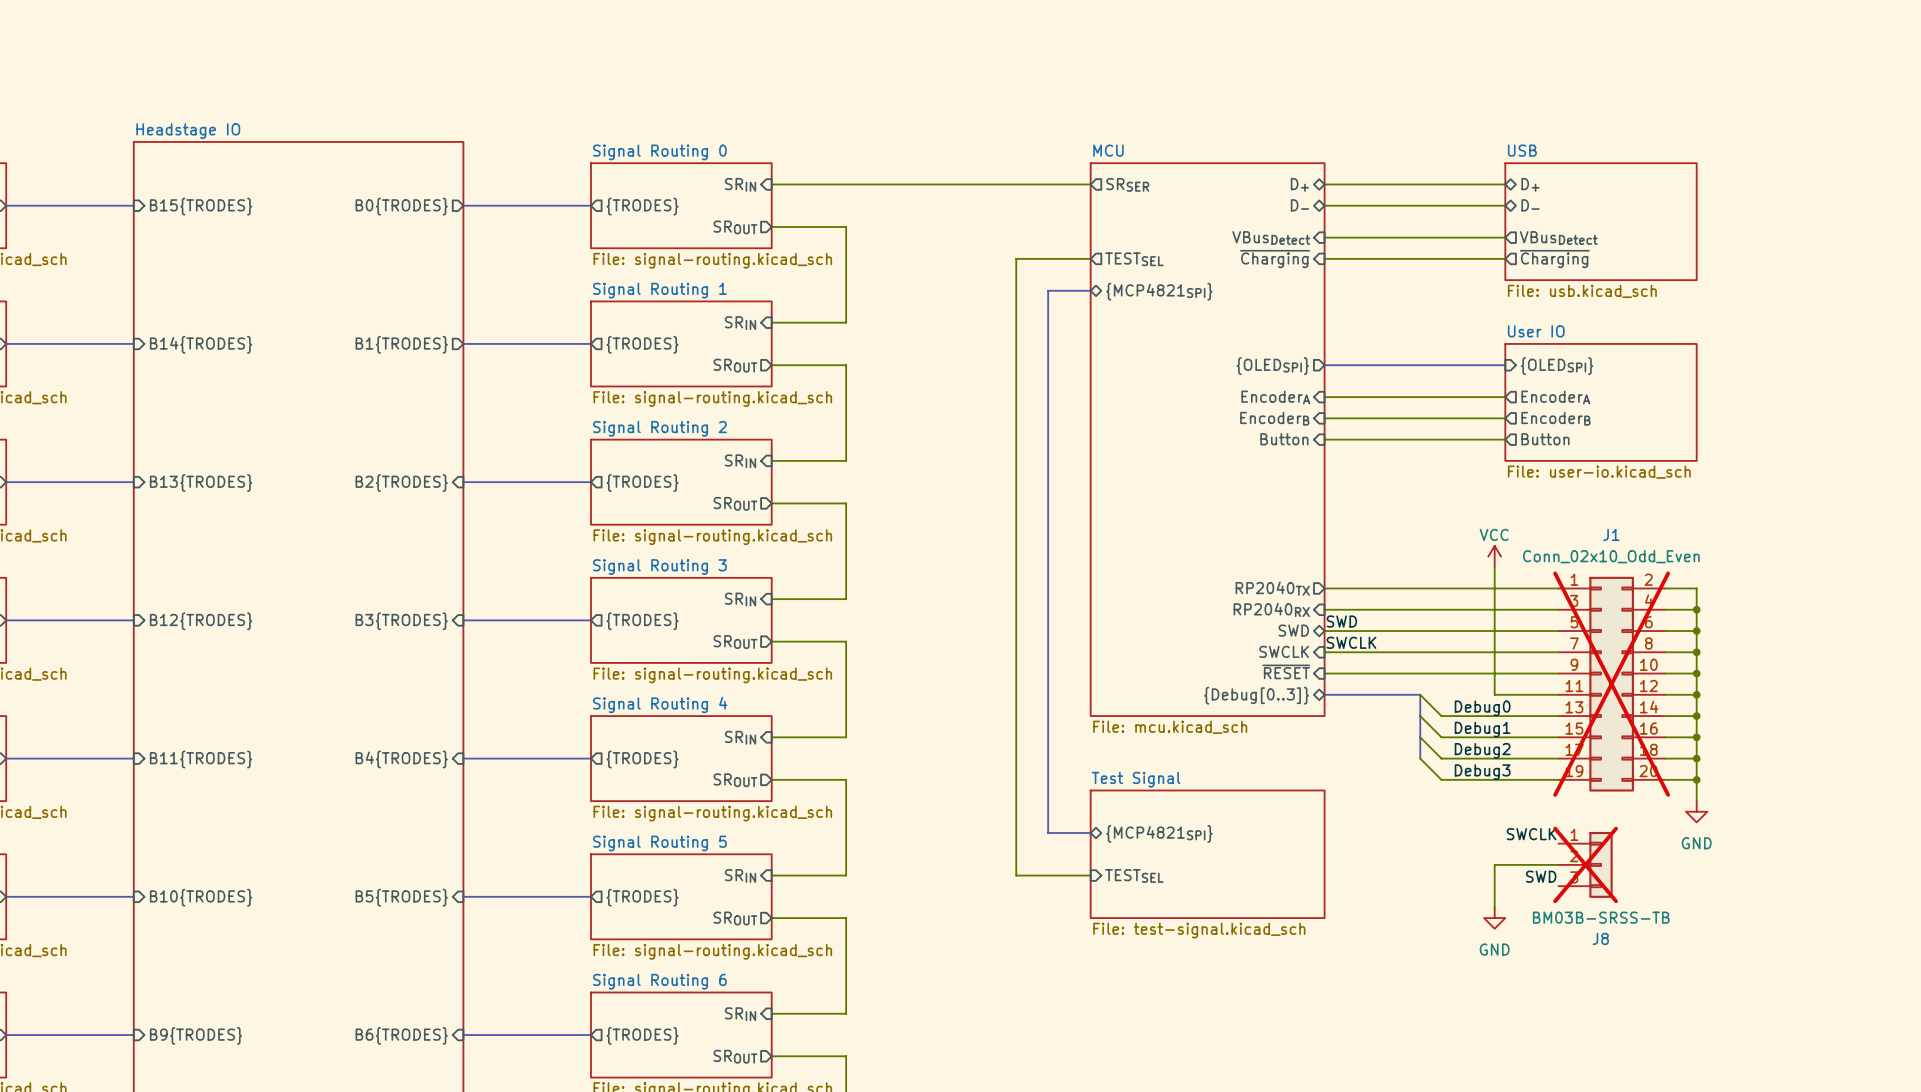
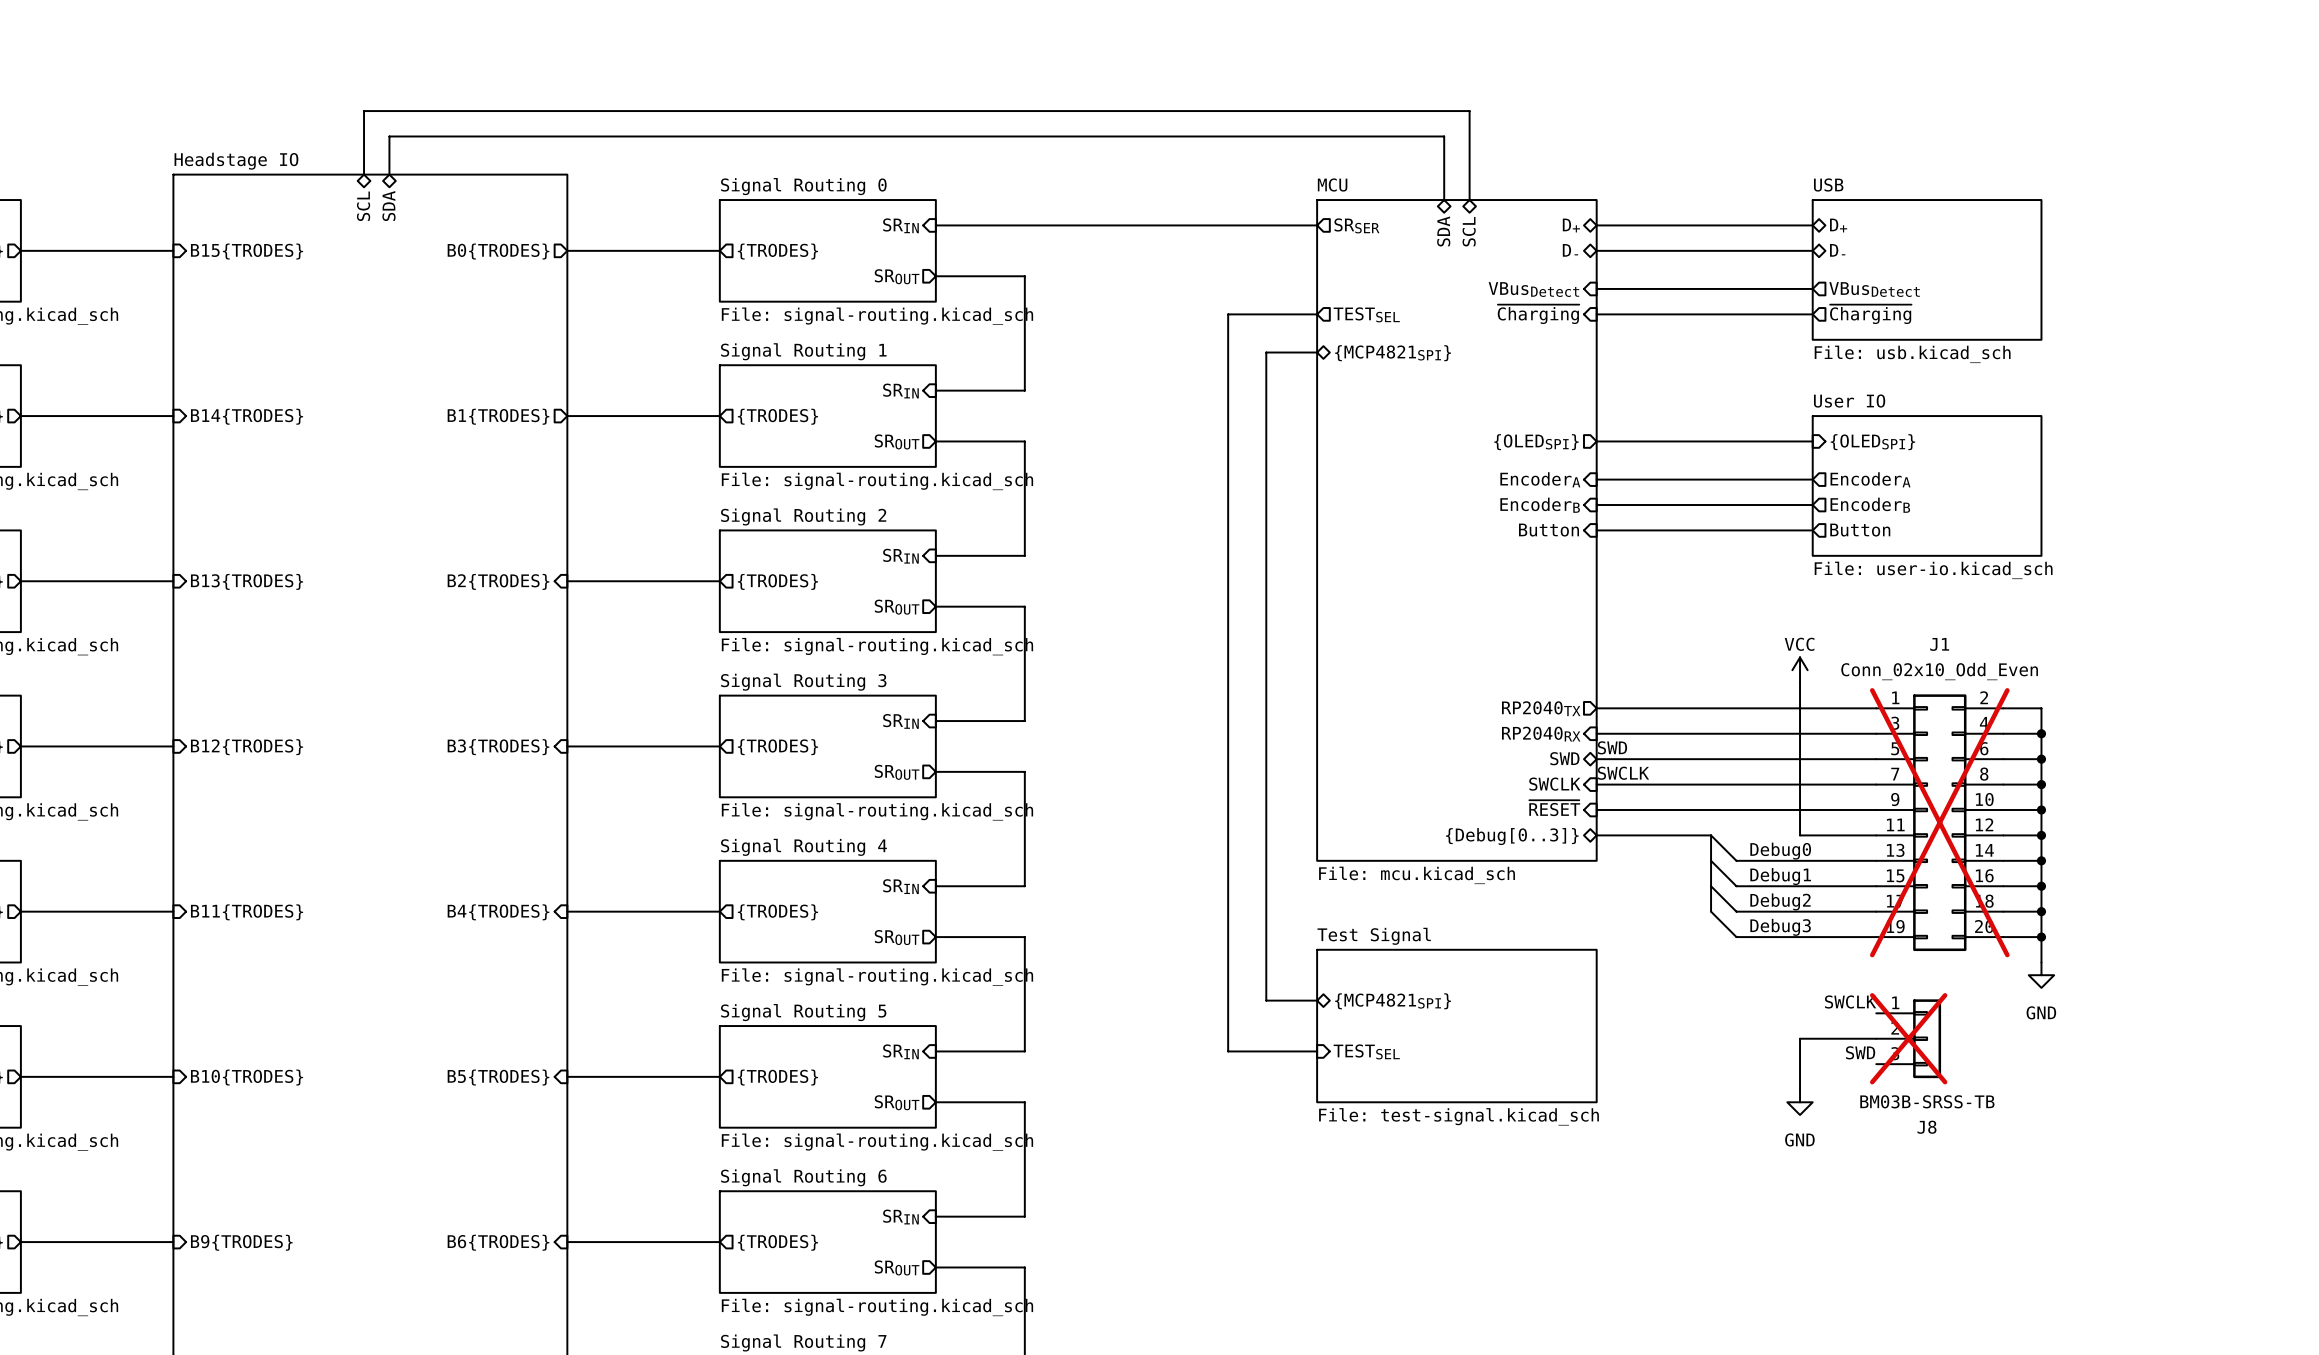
wire: none -> (364, 174) (364, 111) (1469, 111) (1469, 200)
wire: none -> (389, 174) (389, 136) (1444, 136) (1444, 200)
sheet pin: none -> SCL (363, 206)
sheet pin: none -> SDA (388, 206)
sheet pin: none -> SDA (1443, 231)
sheet pin: none -> SCL (1469, 231)

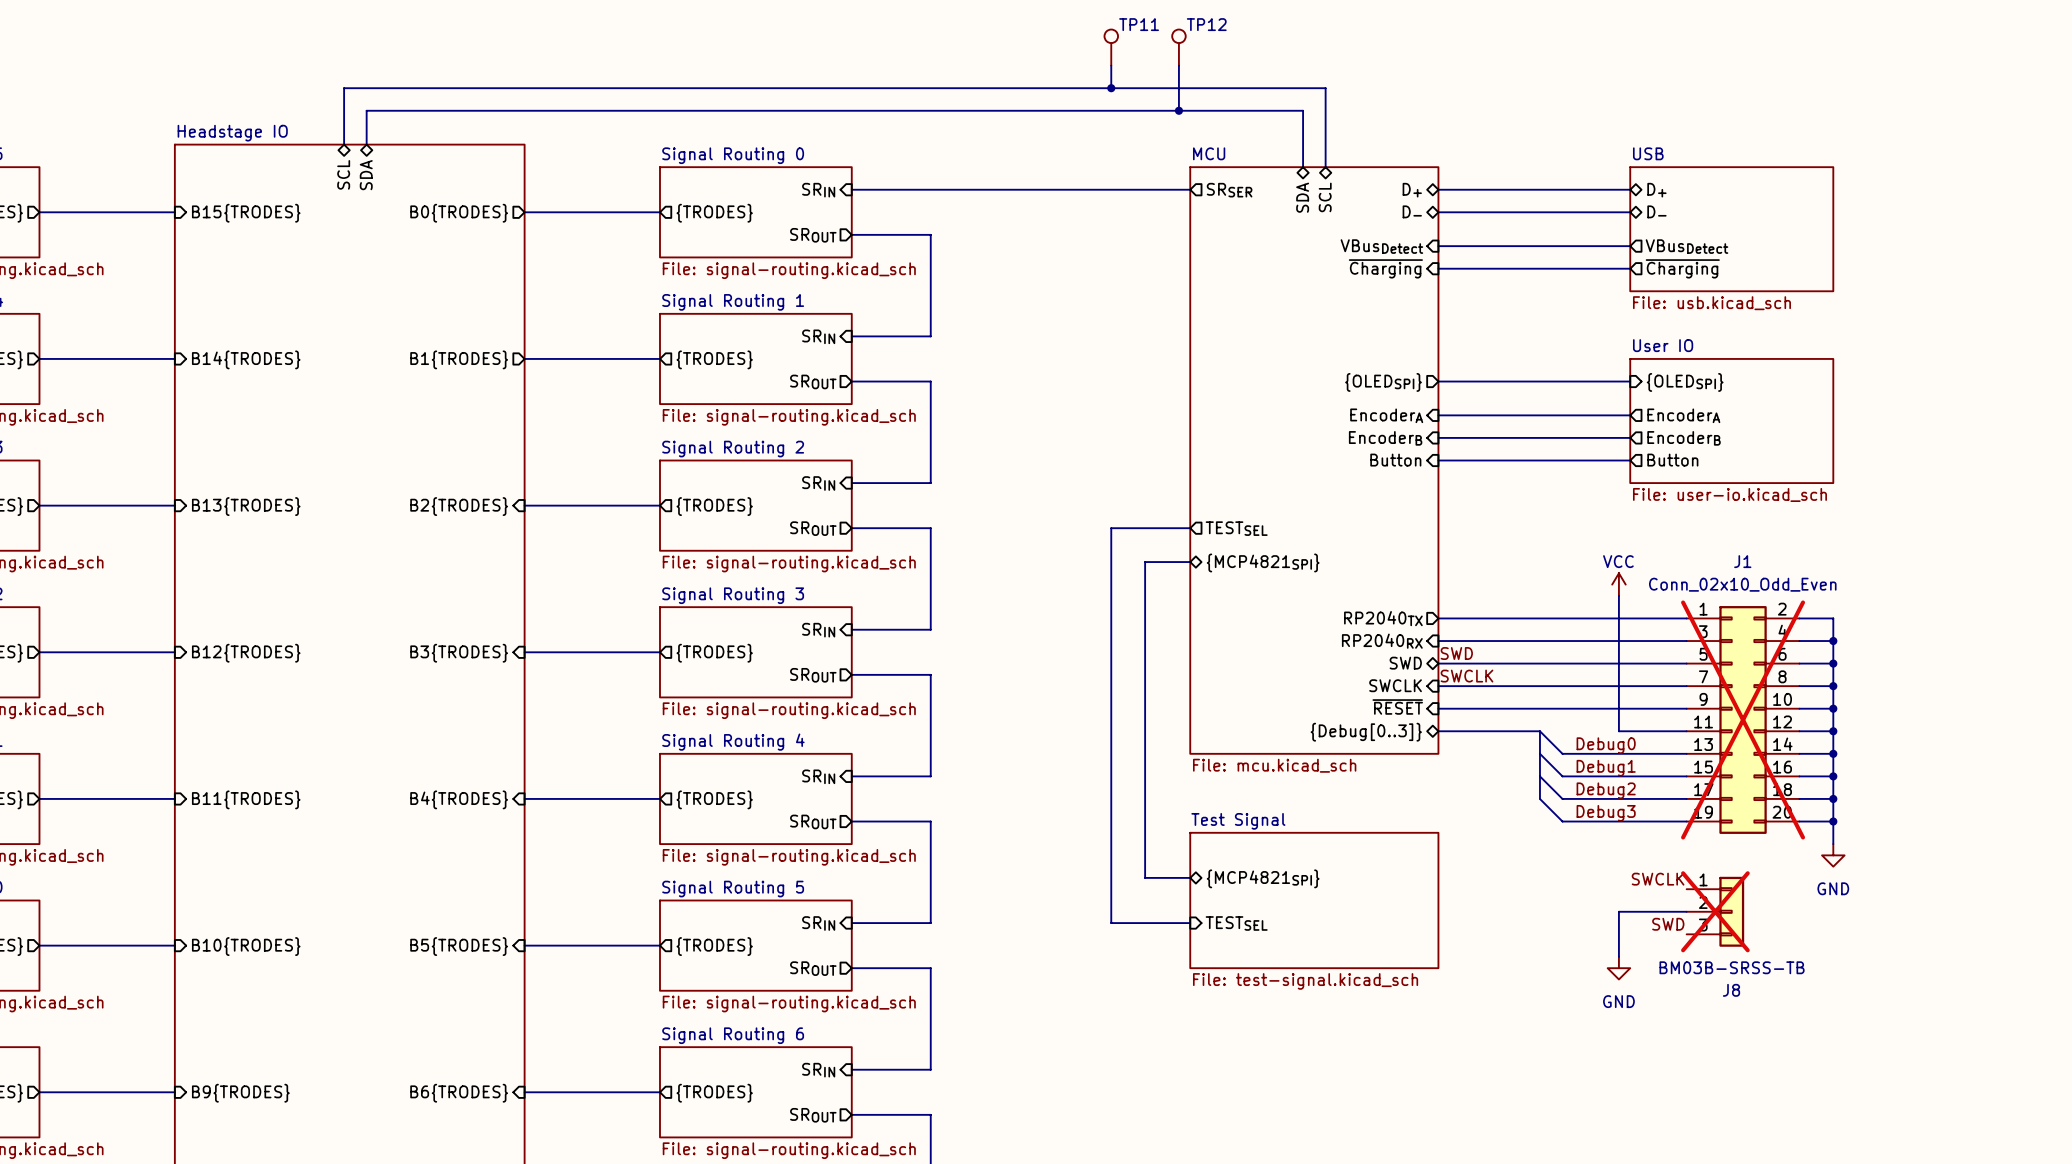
TP11: none -> (1111, 47)
TP12: none -> (1178, 47)
wire: none -> (1111, 65) (1111, 88)
wire: none -> (1178, 65) (1178, 110)
junction: none -> (1111, 88)
junction: none -> (1178, 110)
wire: (1317, 314) (1228, 314) (1228, 606) -> (1190, 528) (1111, 528)
sheet pin: TESTSEL (1366, 314) -> none
bus: (1317, 352) (1266, 352) (1266, 644) -> (1190, 562) (1145, 562)
sheet pin: {MCP4821SPI} (1393, 353) -> none
sheet pin: none -> TESTSEL (1236, 528)
sheet pin: none -> {MCP4821SPI} (1263, 562)

